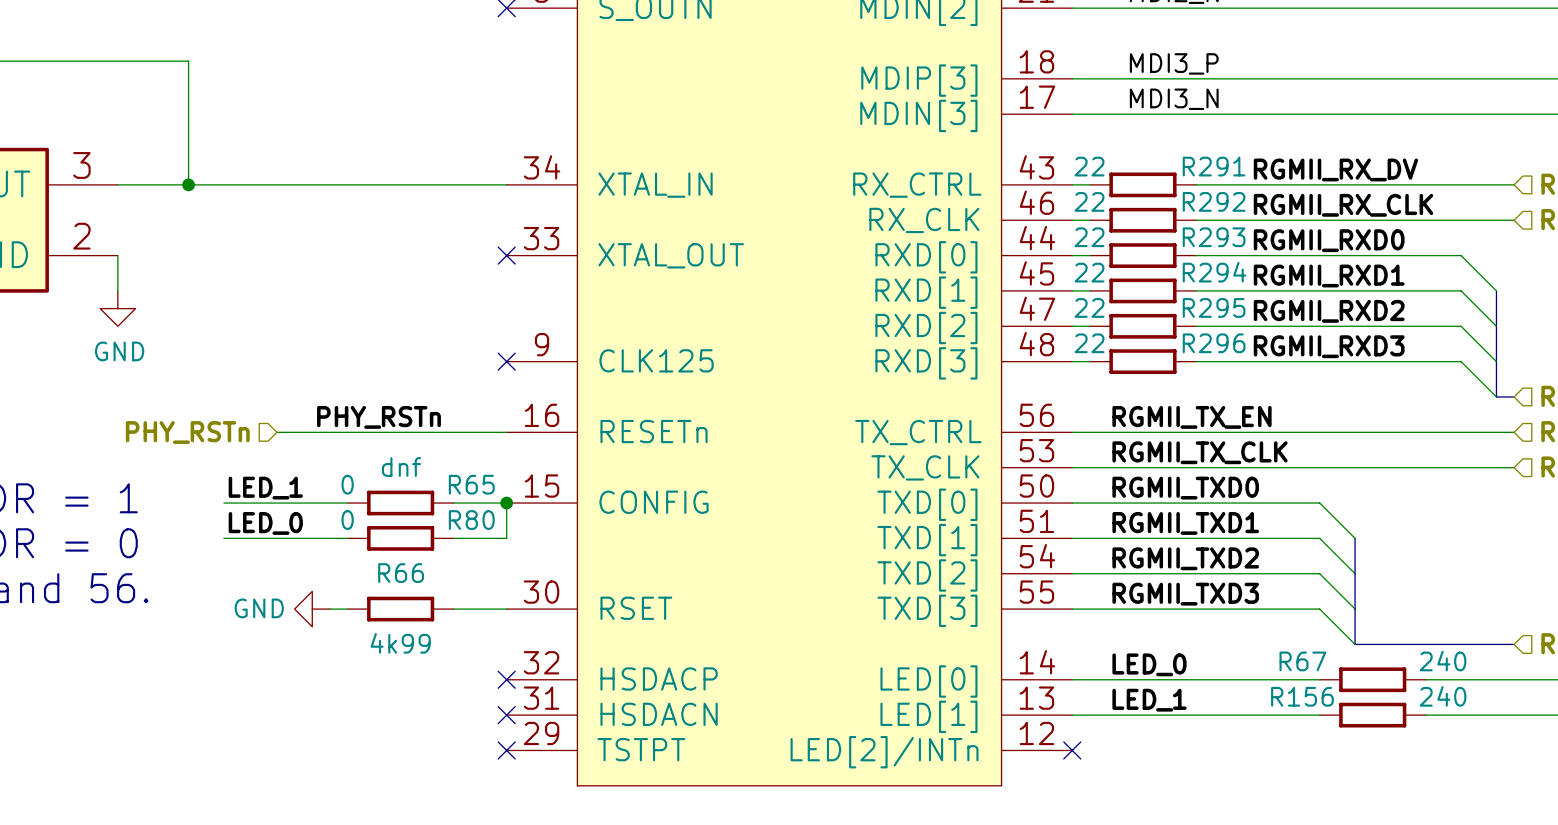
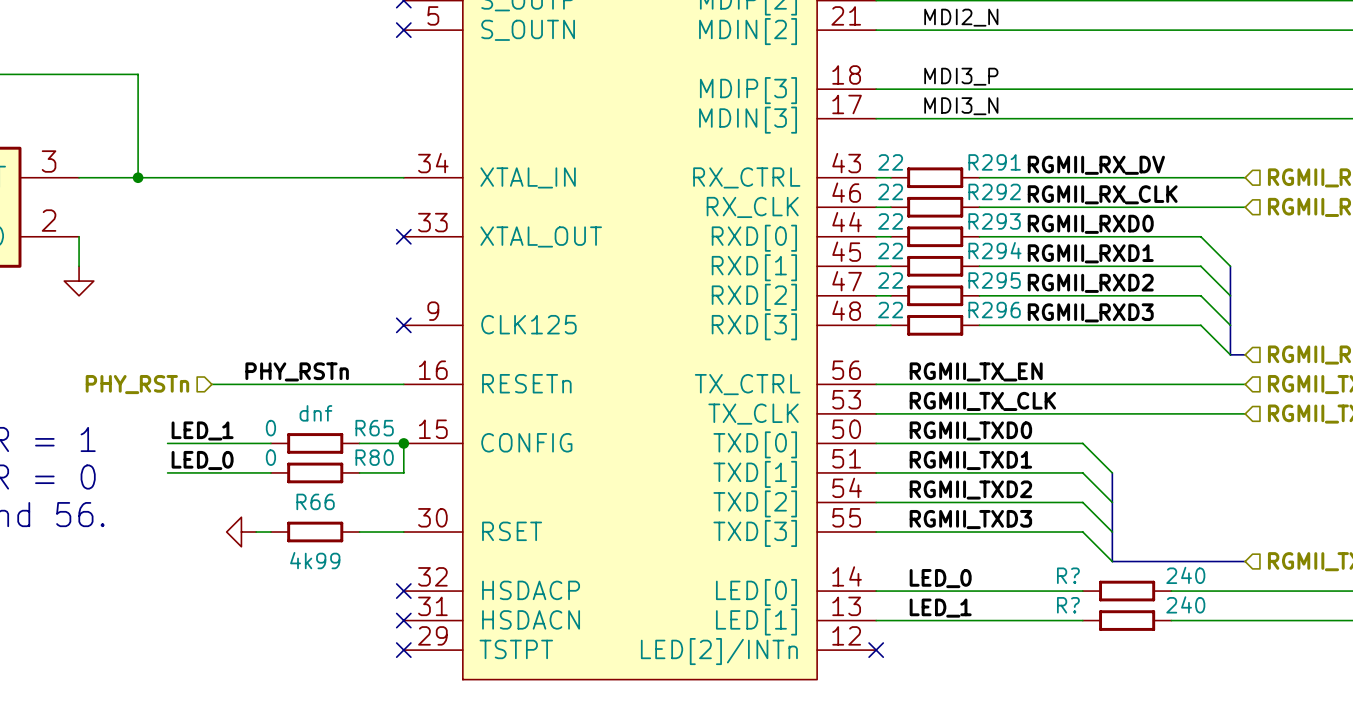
power symbol text: GND (119, 351) -> none
power symbol text: GND (259, 608) -> none
R67 name: R67 (1302, 661) -> R? (1068, 575)
R156 name: R156 (1302, 696) -> R? (1068, 605)

